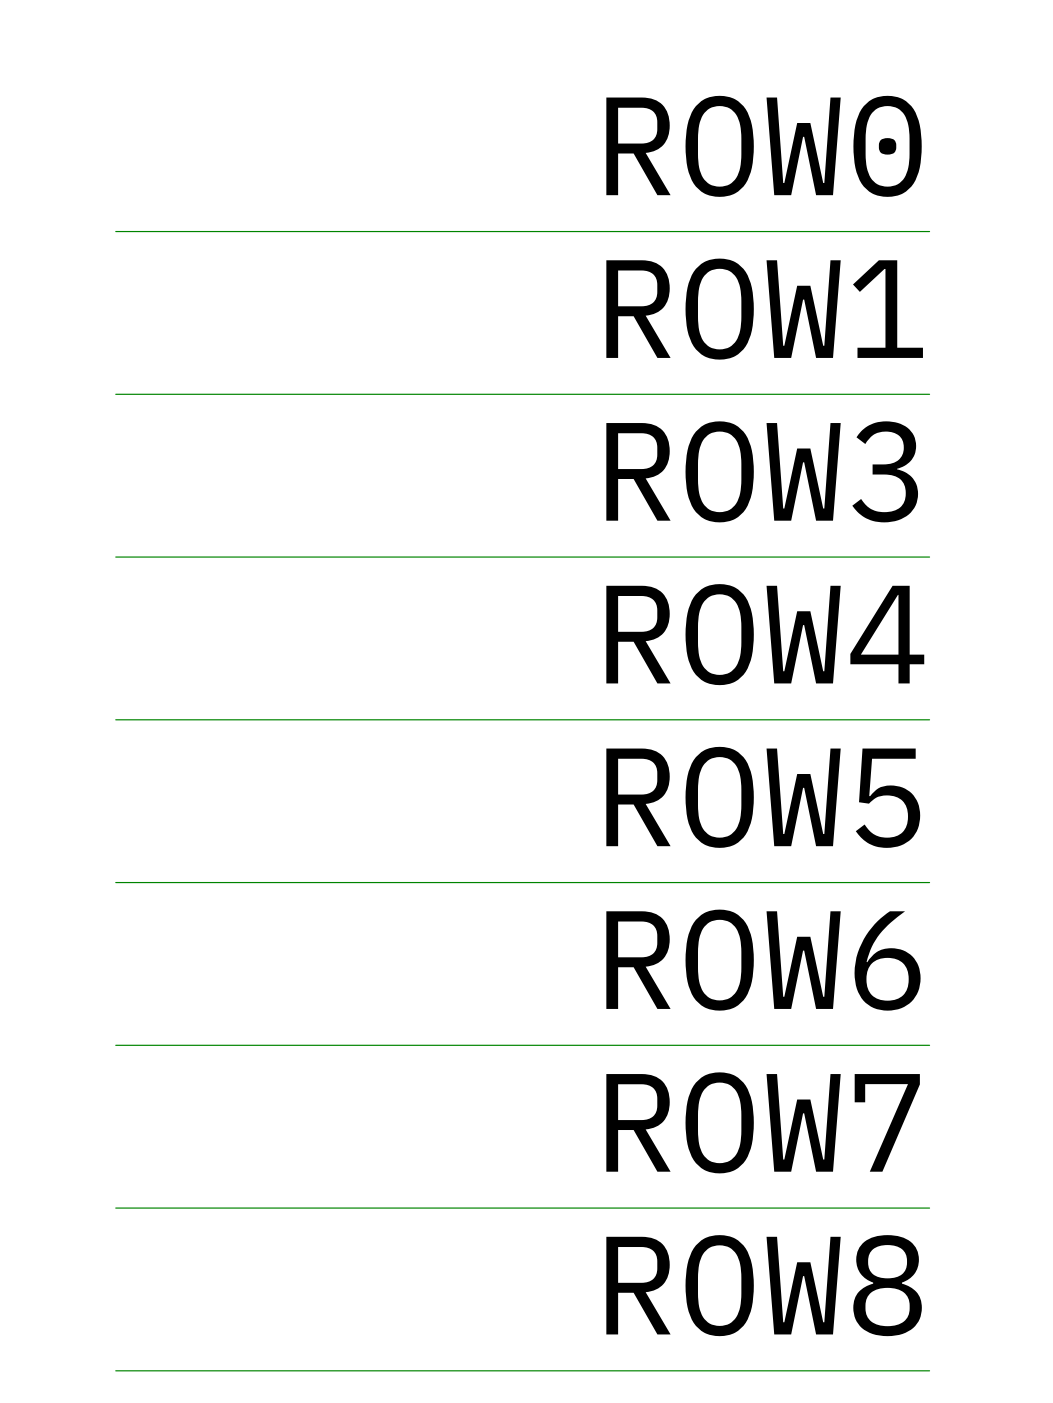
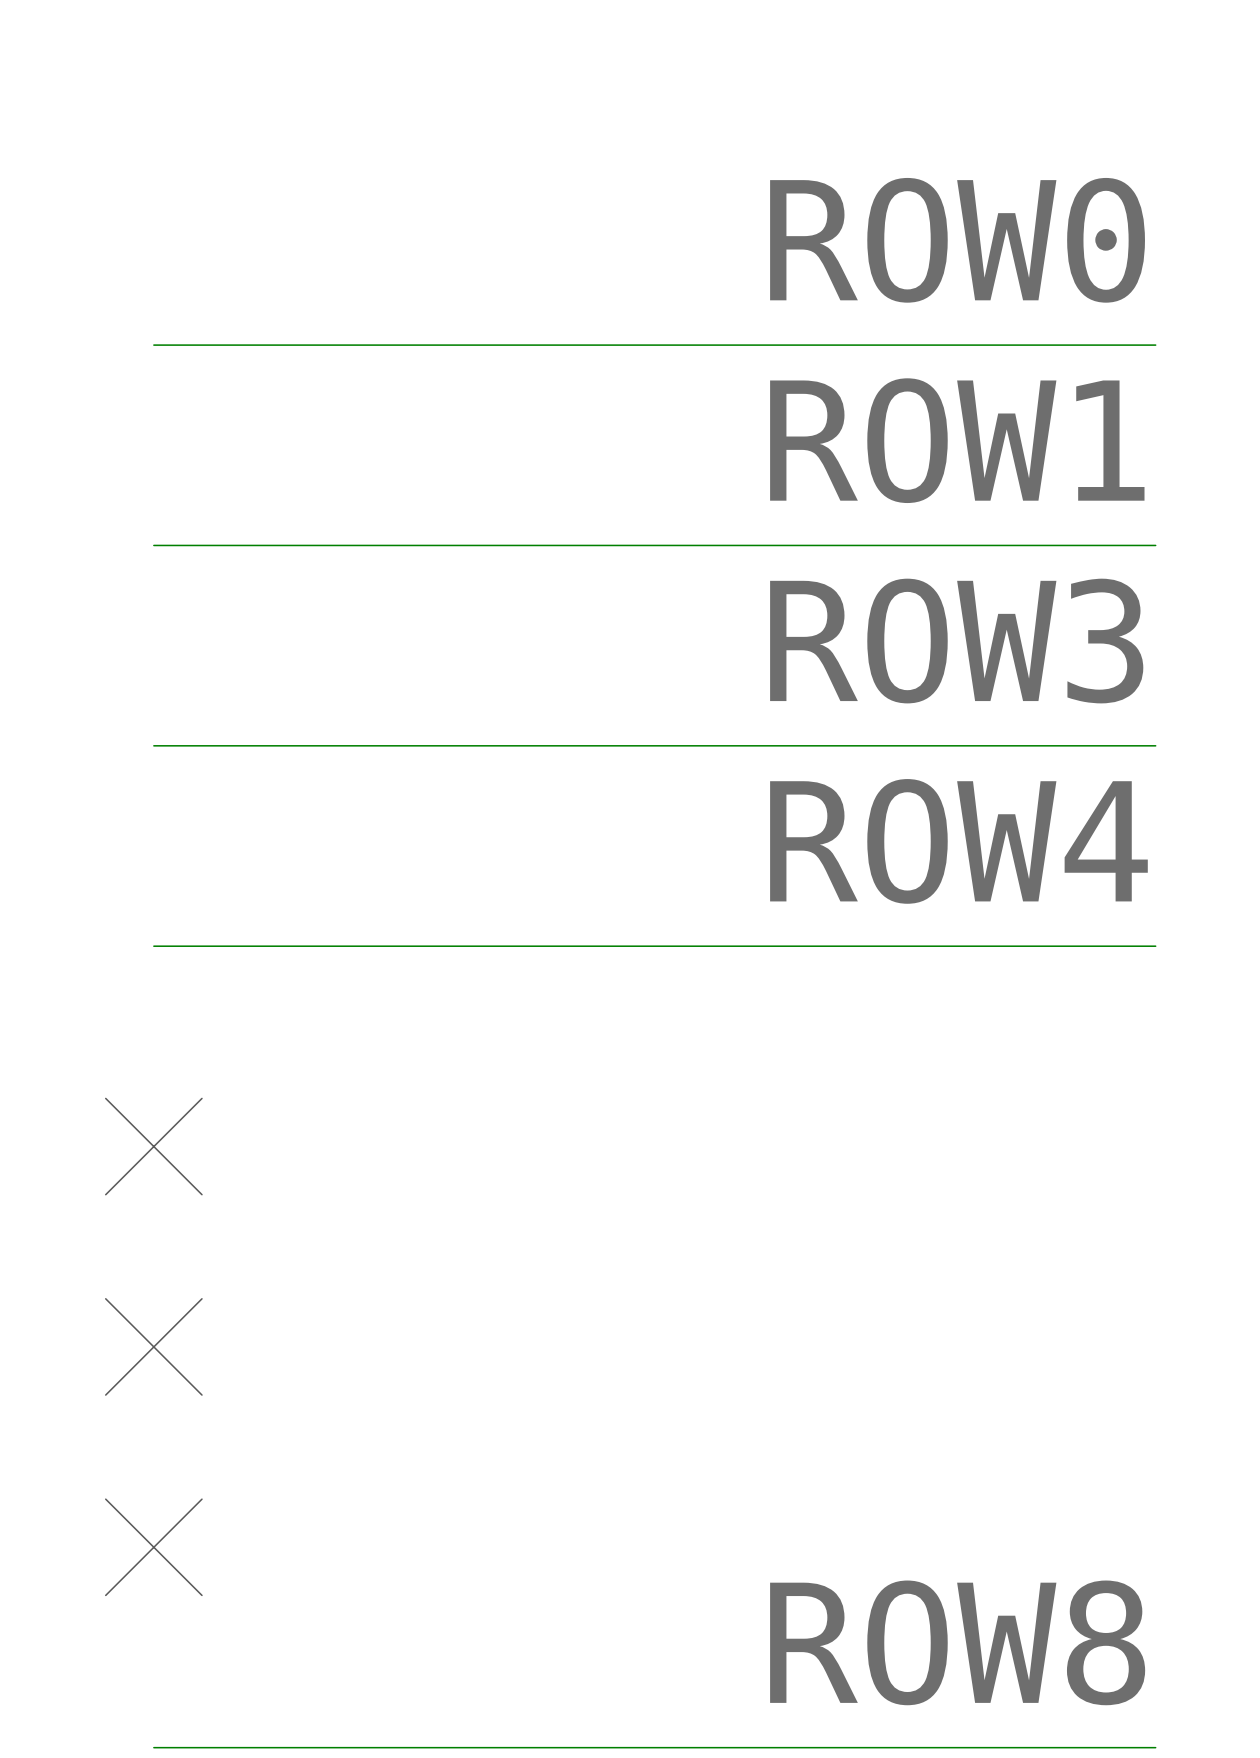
label: ROW5 (763, 797) -> none
wire: (115, 882) (929, 882) -> none
no-connect mark: none -> (153, 1146)
label: ROW6 (763, 960) -> none
wire: (115, 1045) (929, 1045) -> none
no-connect mark: none -> (153, 1346)
label: ROW7 (763, 1122) -> none
wire: (115, 1208) (929, 1208) -> none
no-connect mark: none -> (153, 1547)

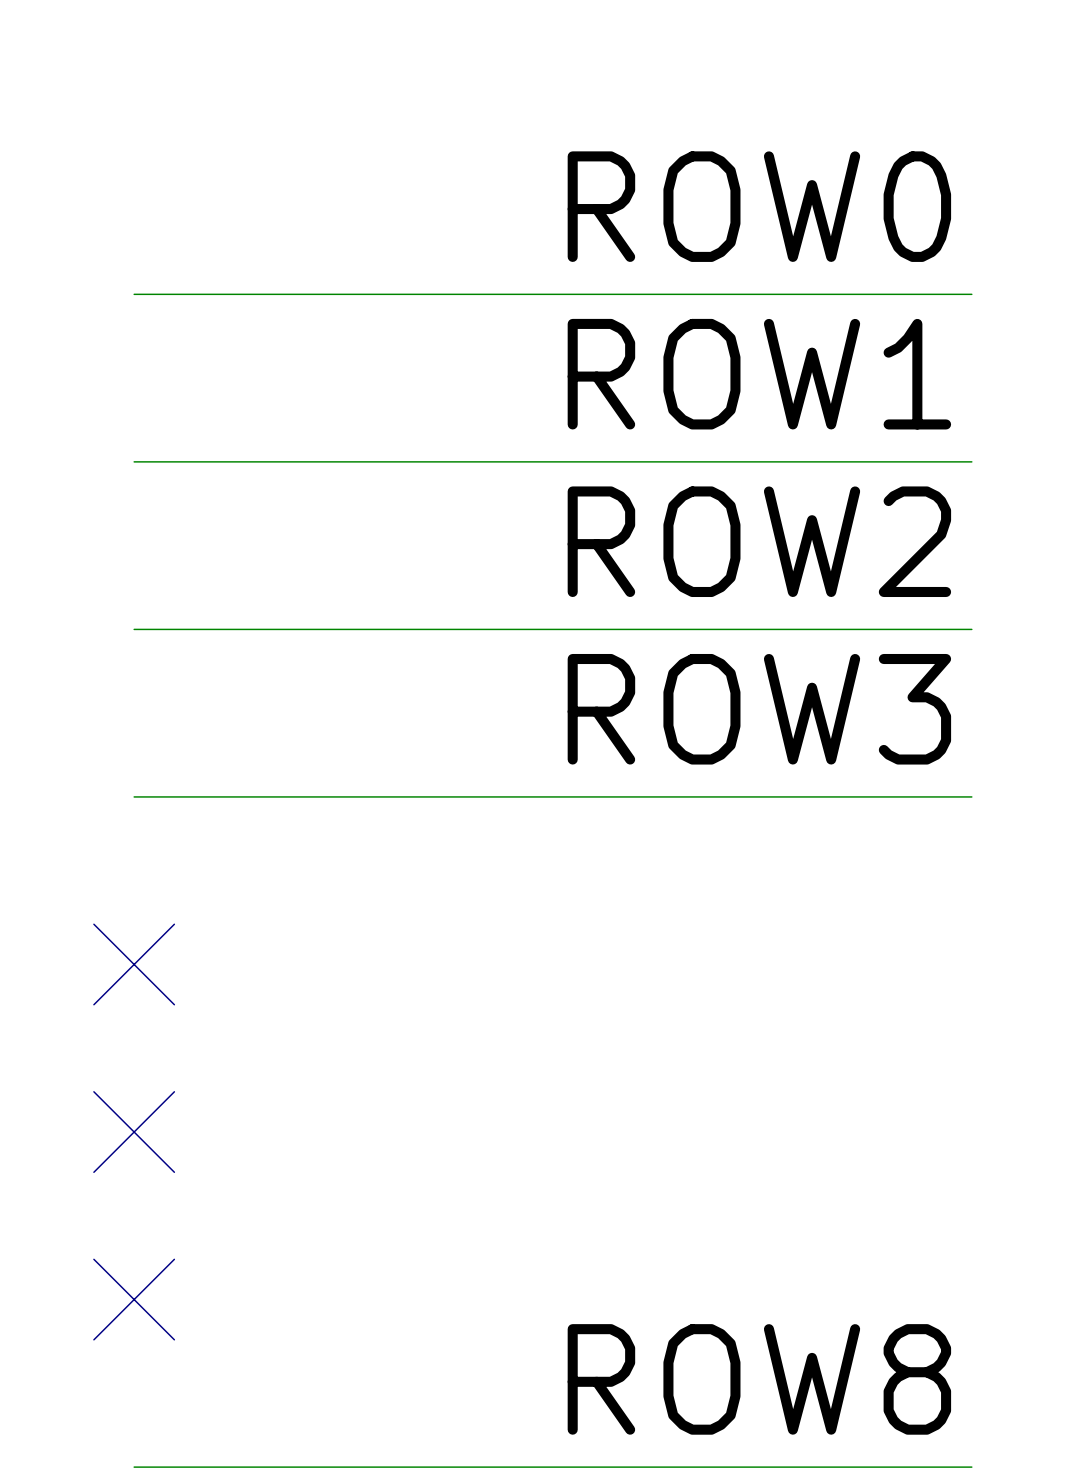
label: ROW3 (956, 641) -> ROW2 (759, 541)
label: ROW4 (958, 841) -> ROW3 (759, 709)

